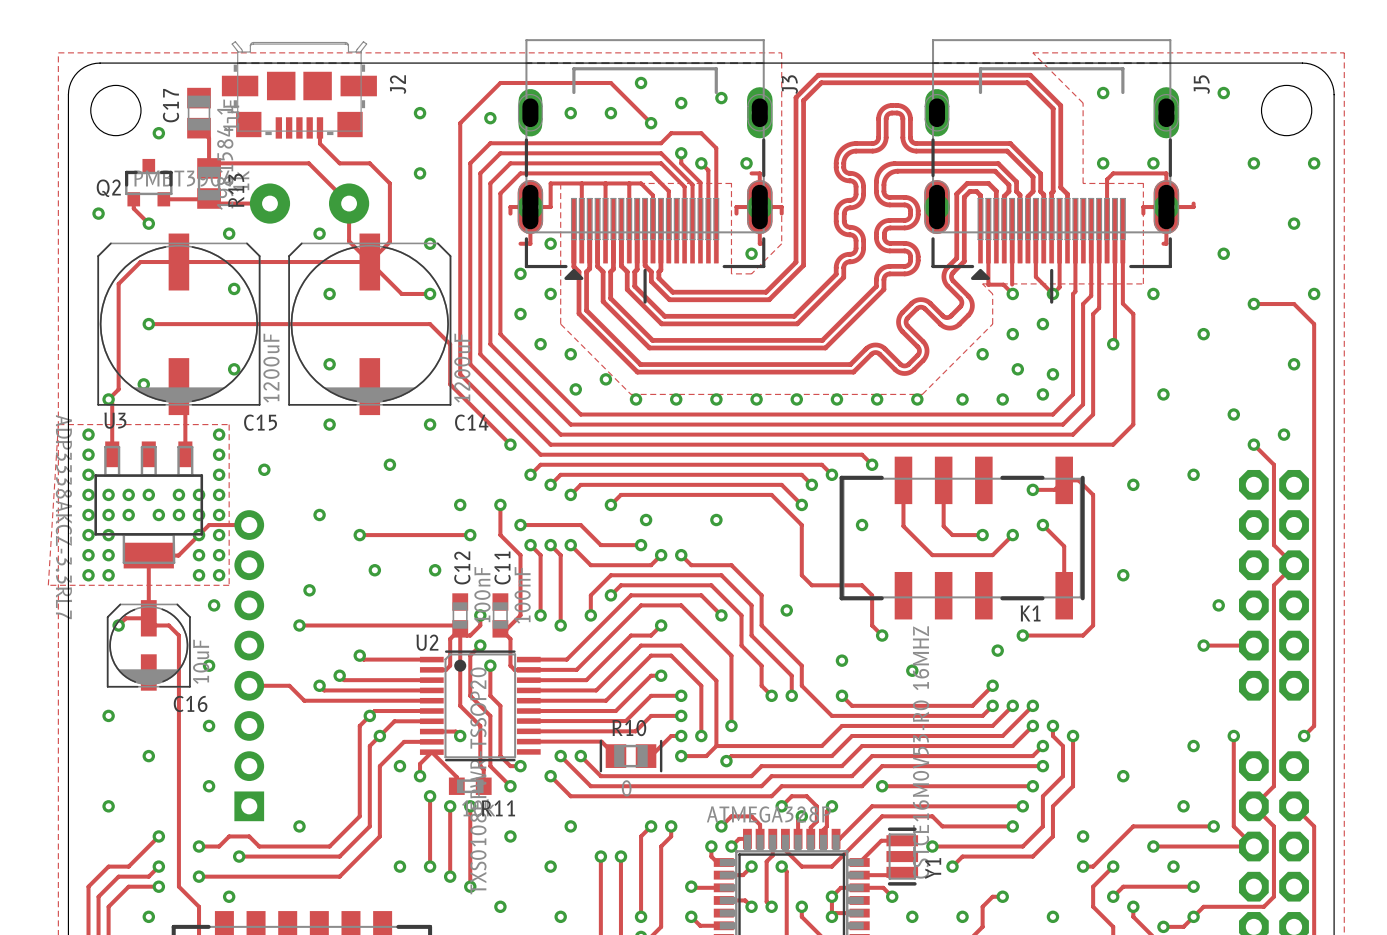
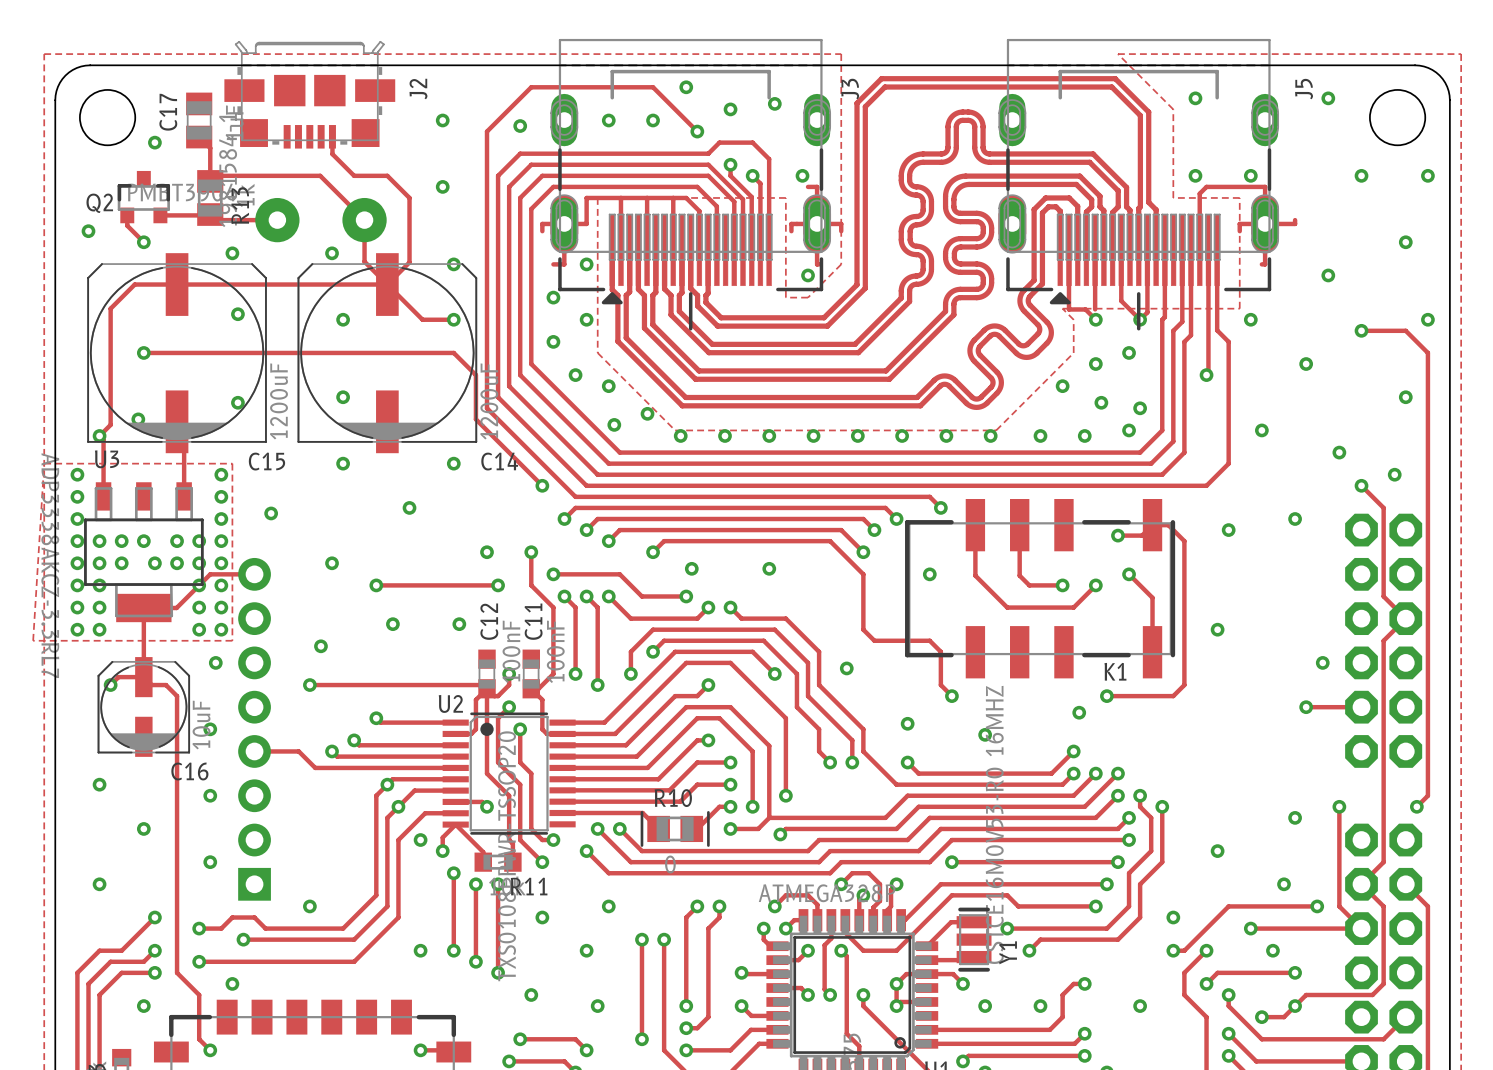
J3 footprint: [517, 39, 773, 304] -> [551, 38, 831, 331]
J5 footprint: [924, 39, 1180, 304] -> [999, 38, 1279, 331]

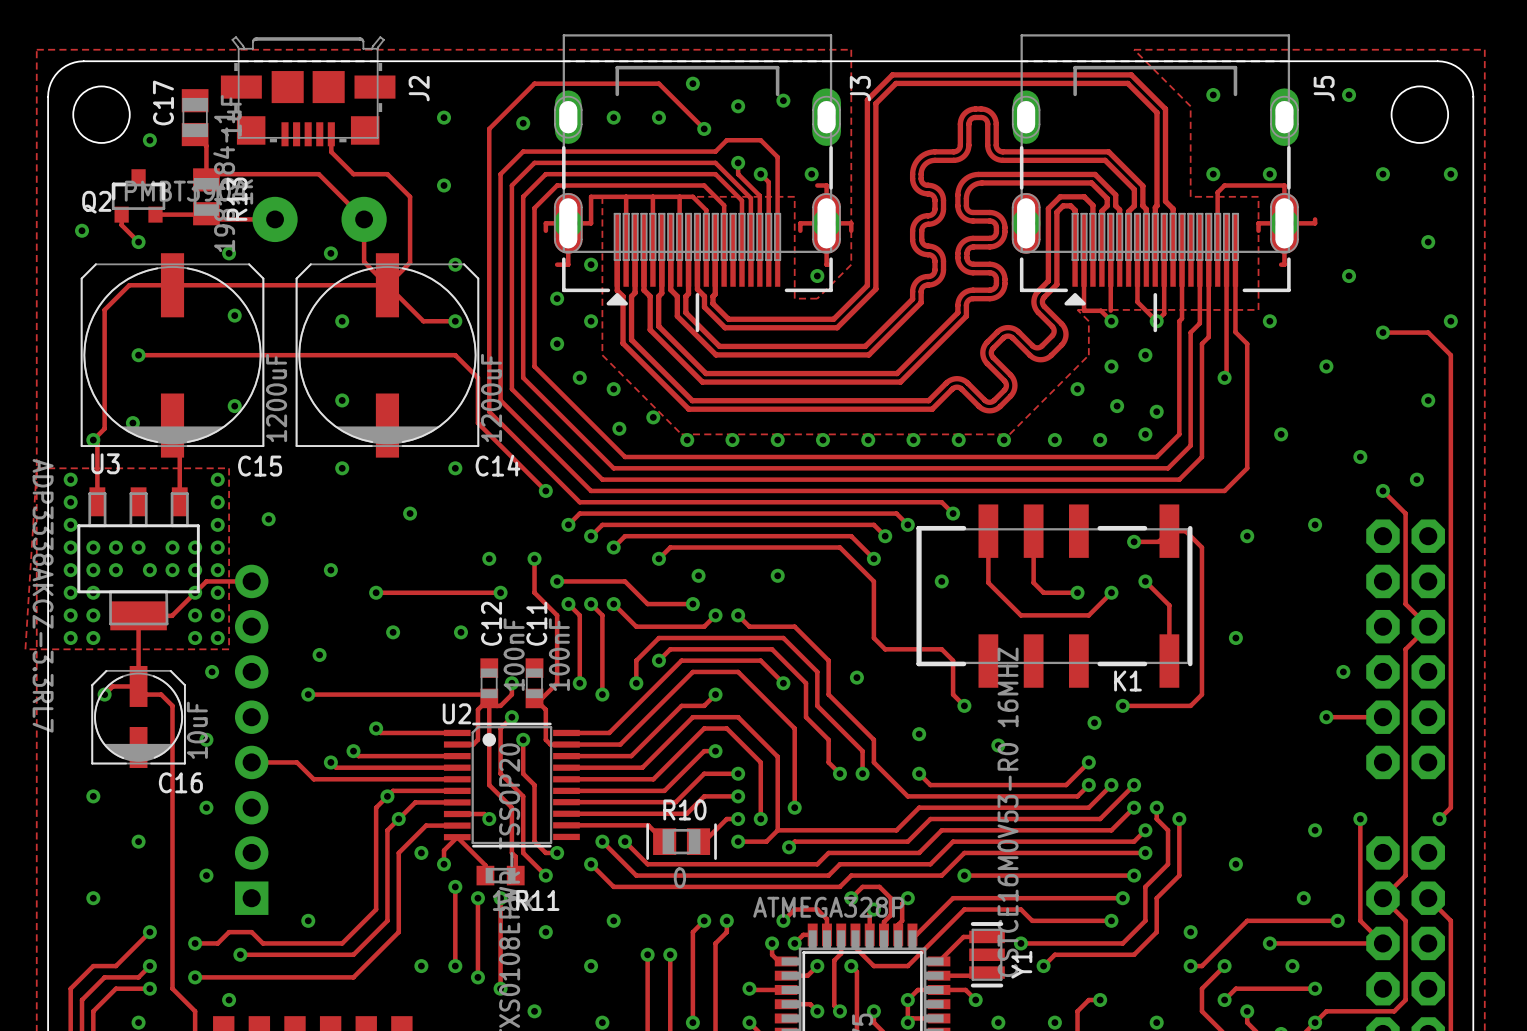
J3 footprint: [551, 38, 831, 331] -> [553, 34, 841, 333]
J5 footprint: [999, 38, 1279, 331] -> [1011, 34, 1299, 333]

